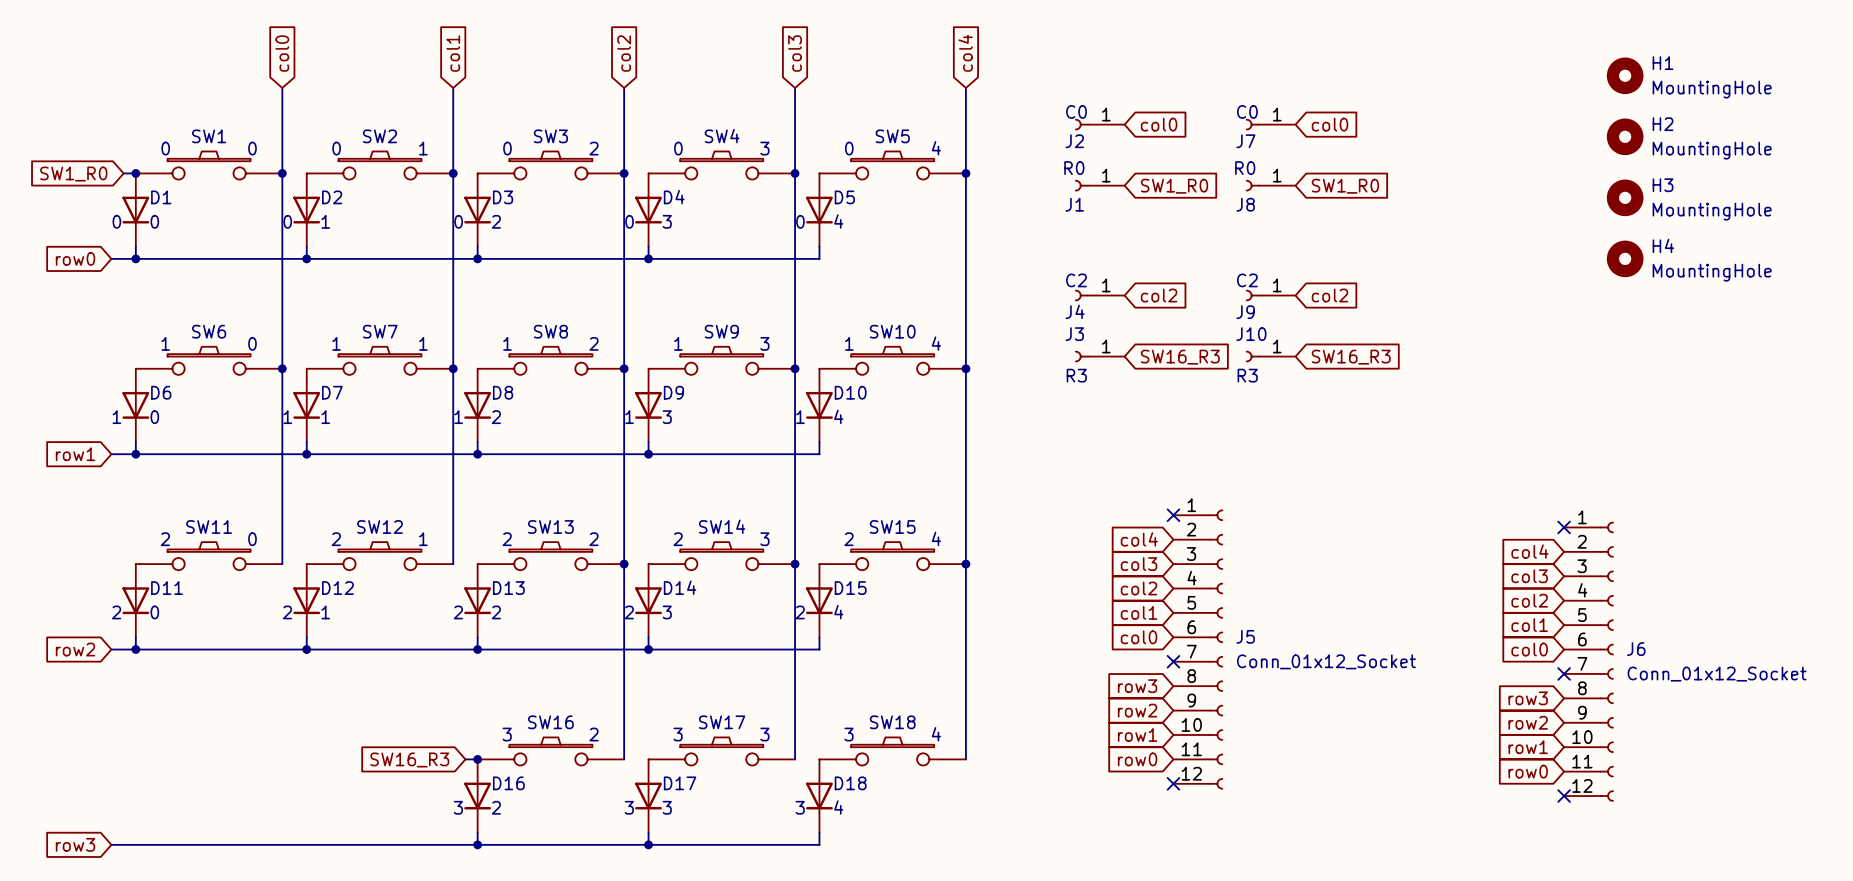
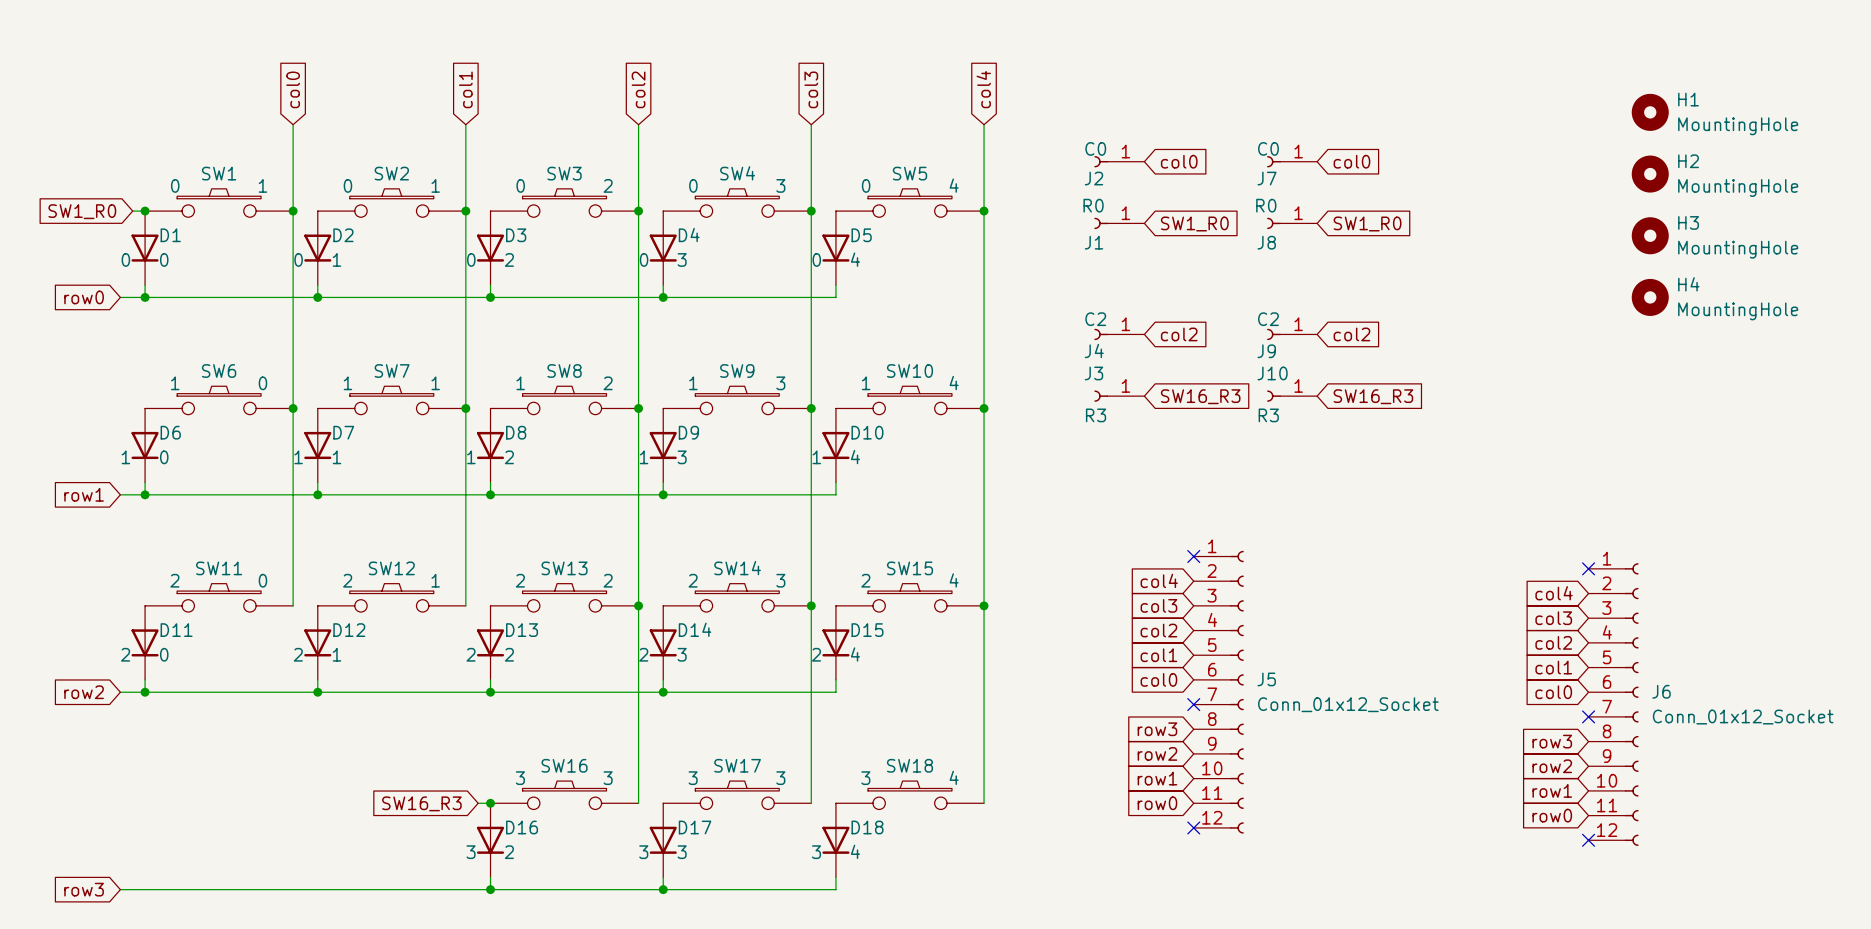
SW1 text: 0 (252, 148) -> 1 (262, 185)
SW16 text: 2 (594, 734) -> 3 (608, 778)

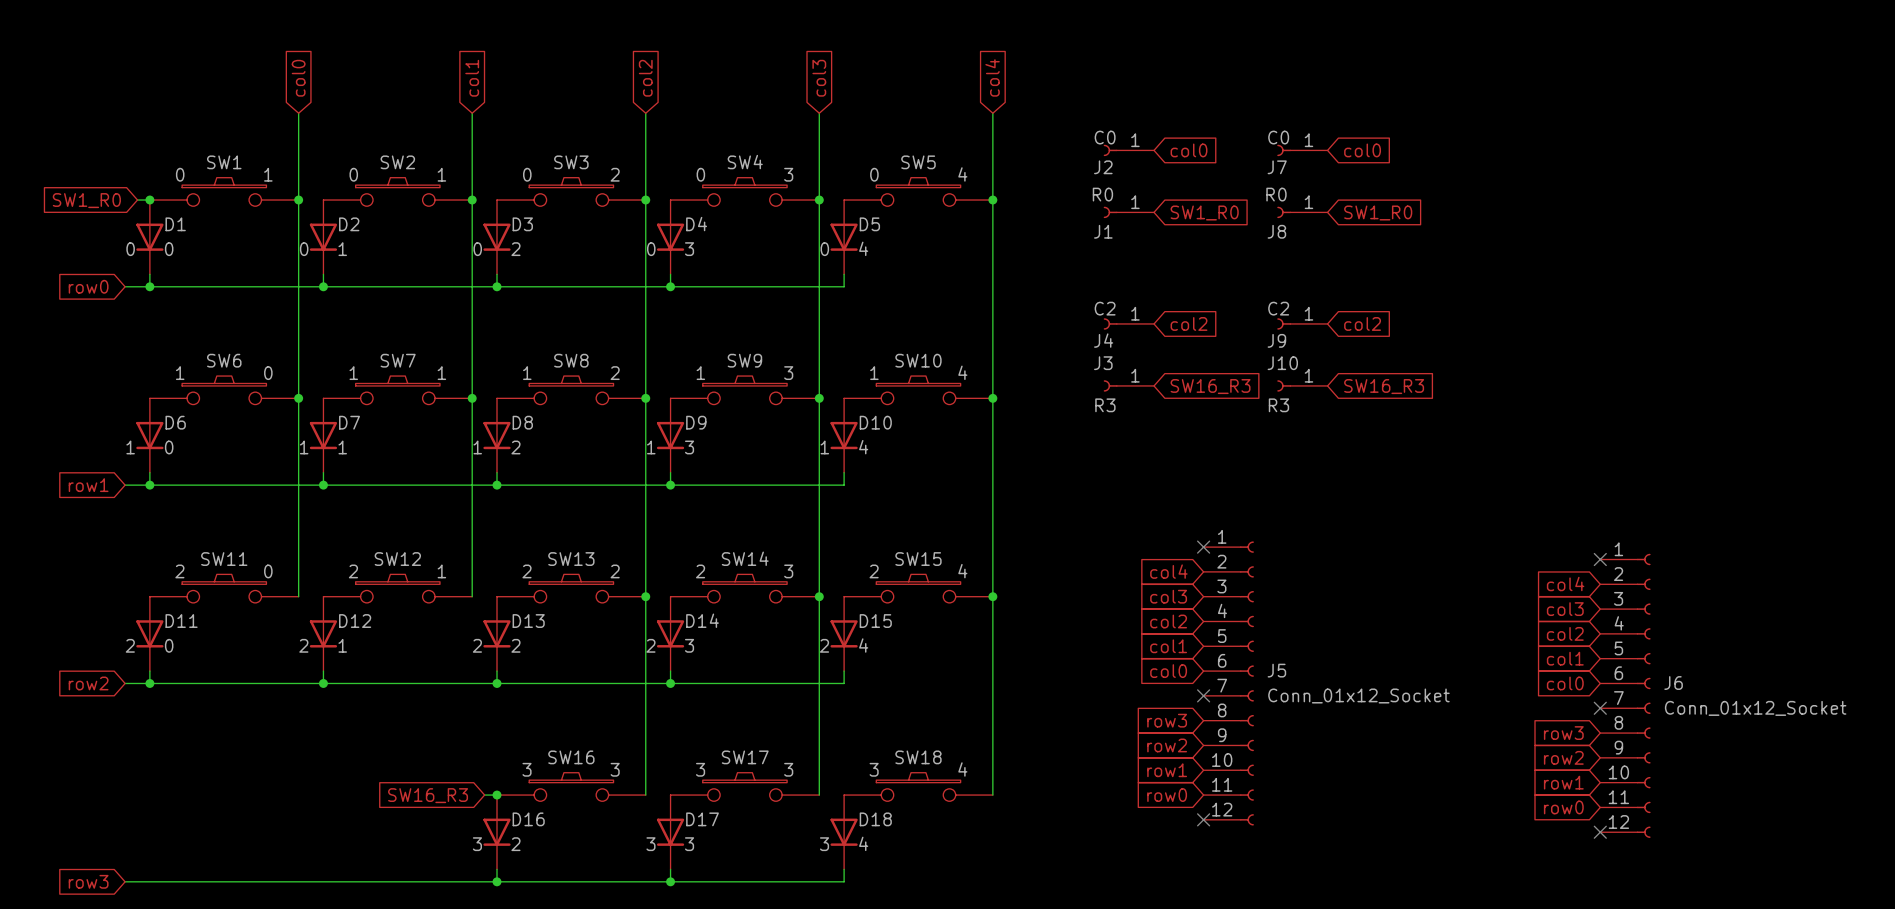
H1: MountingHole (1650, 112) -> none
H2: MountingHole (1650, 174) -> none
H3: MountingHole (1650, 235) -> none
H4: MountingHole (1650, 297) -> none

